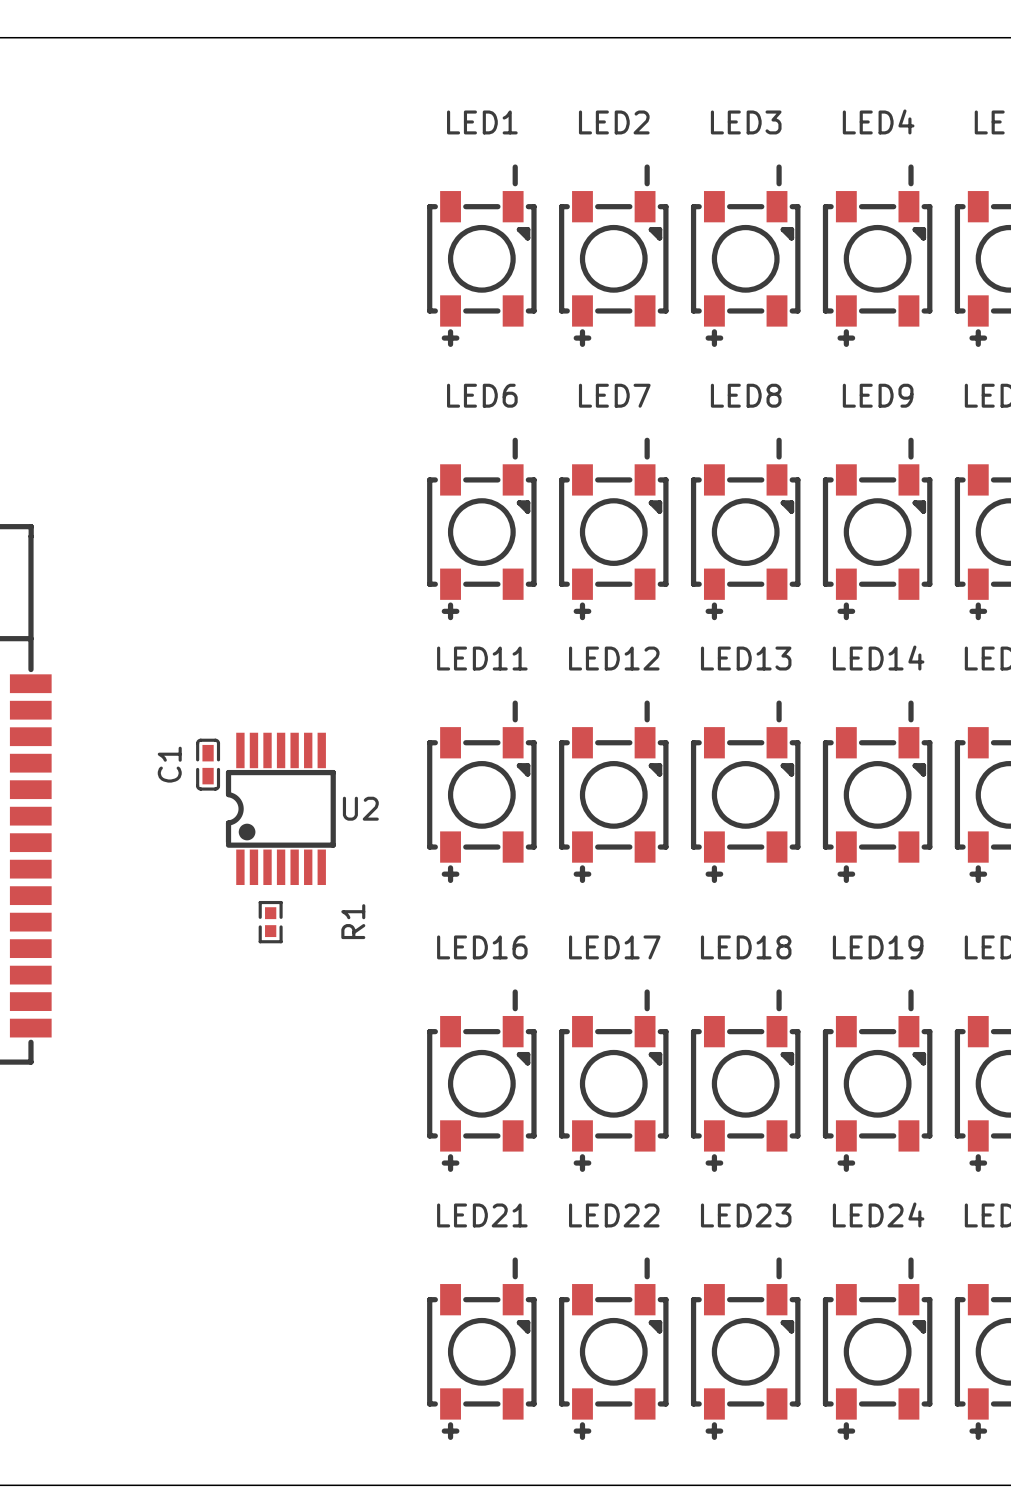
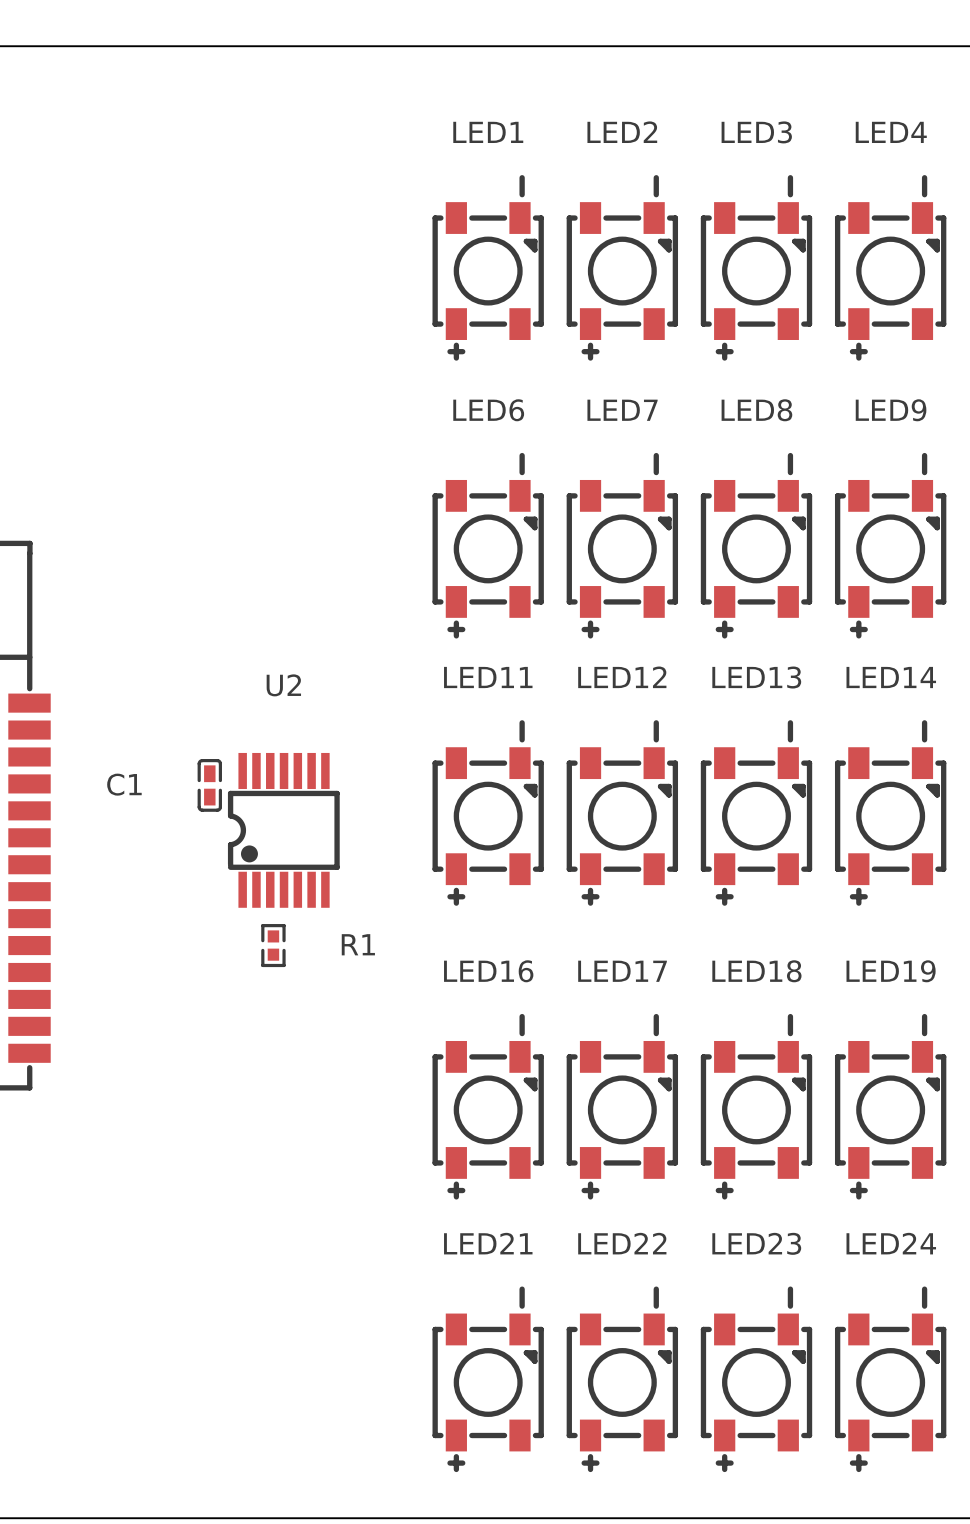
C1 name rotation: 0° (169, 764) -> 90° clockwise (124, 784)
U2 name position: U2 (360, 808) -> U2 (283, 685)
R1 name rotation: 0° (353, 921) -> 90° clockwise (358, 944)

